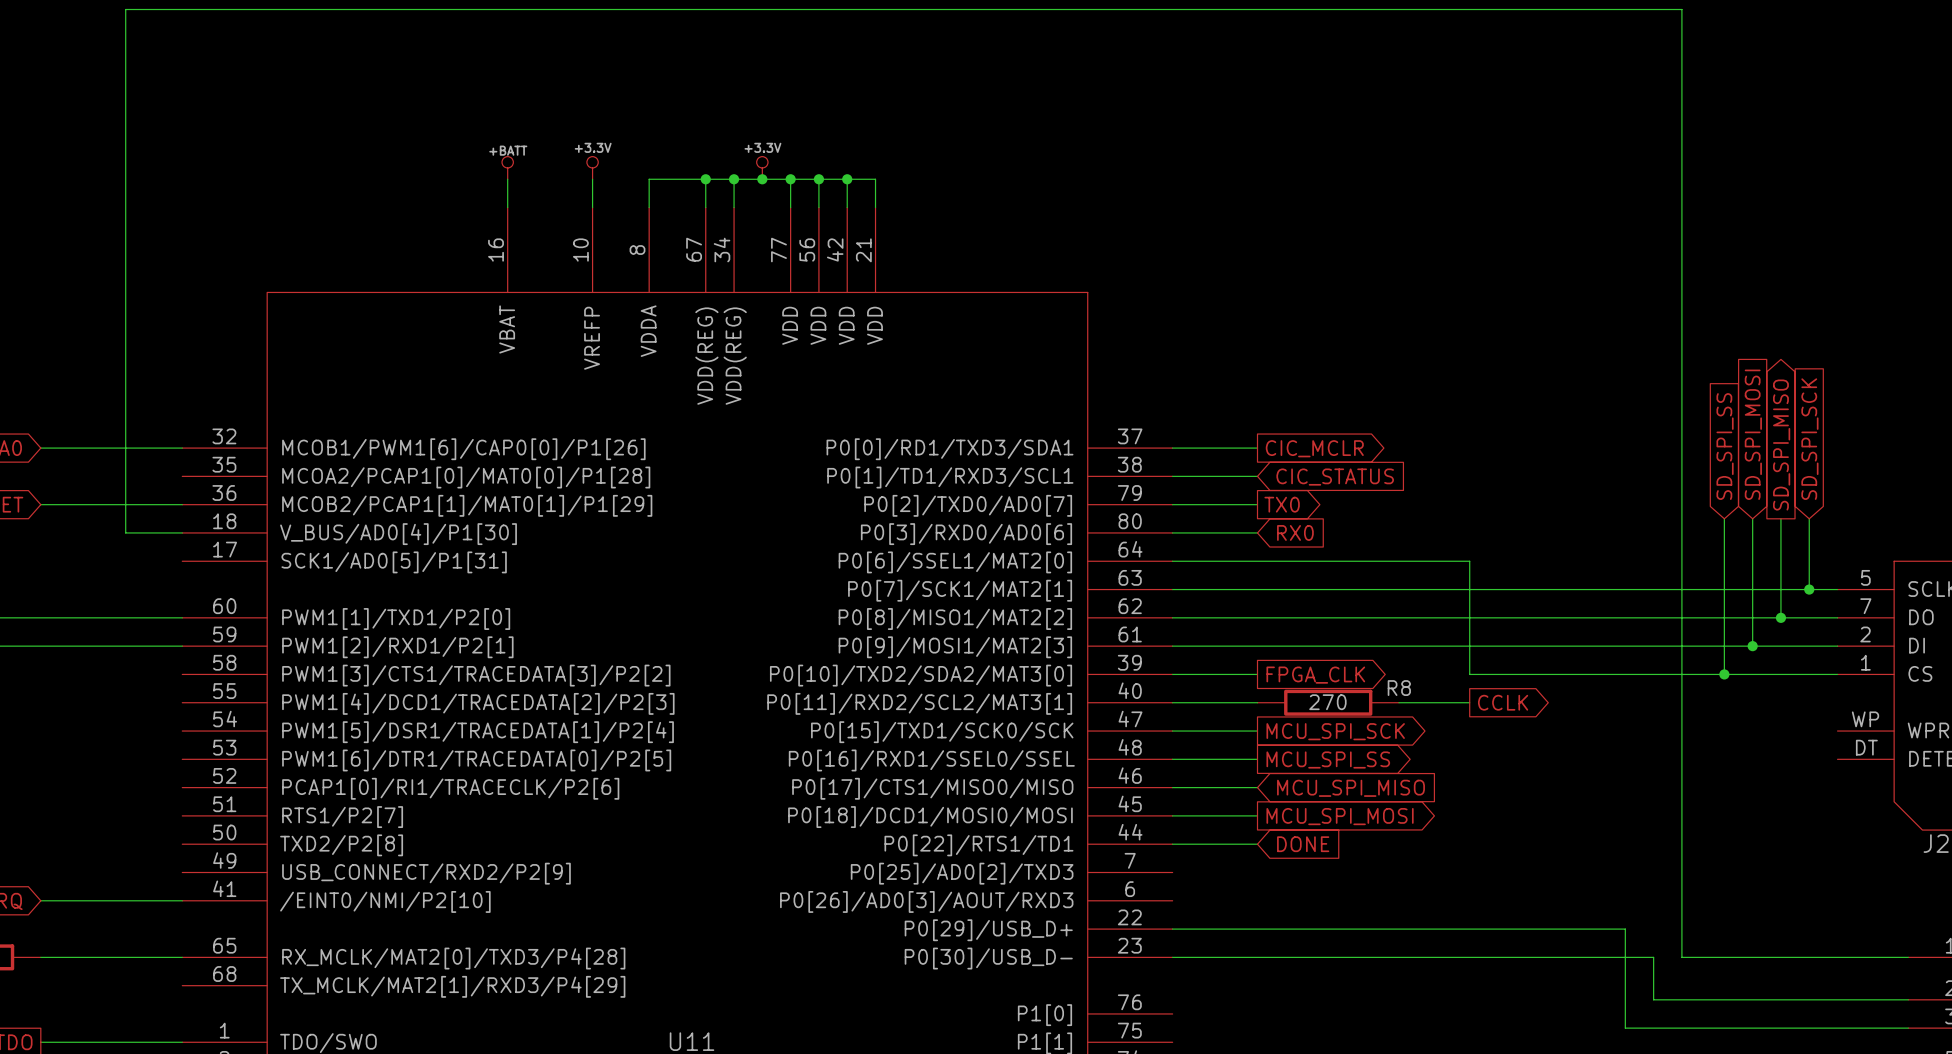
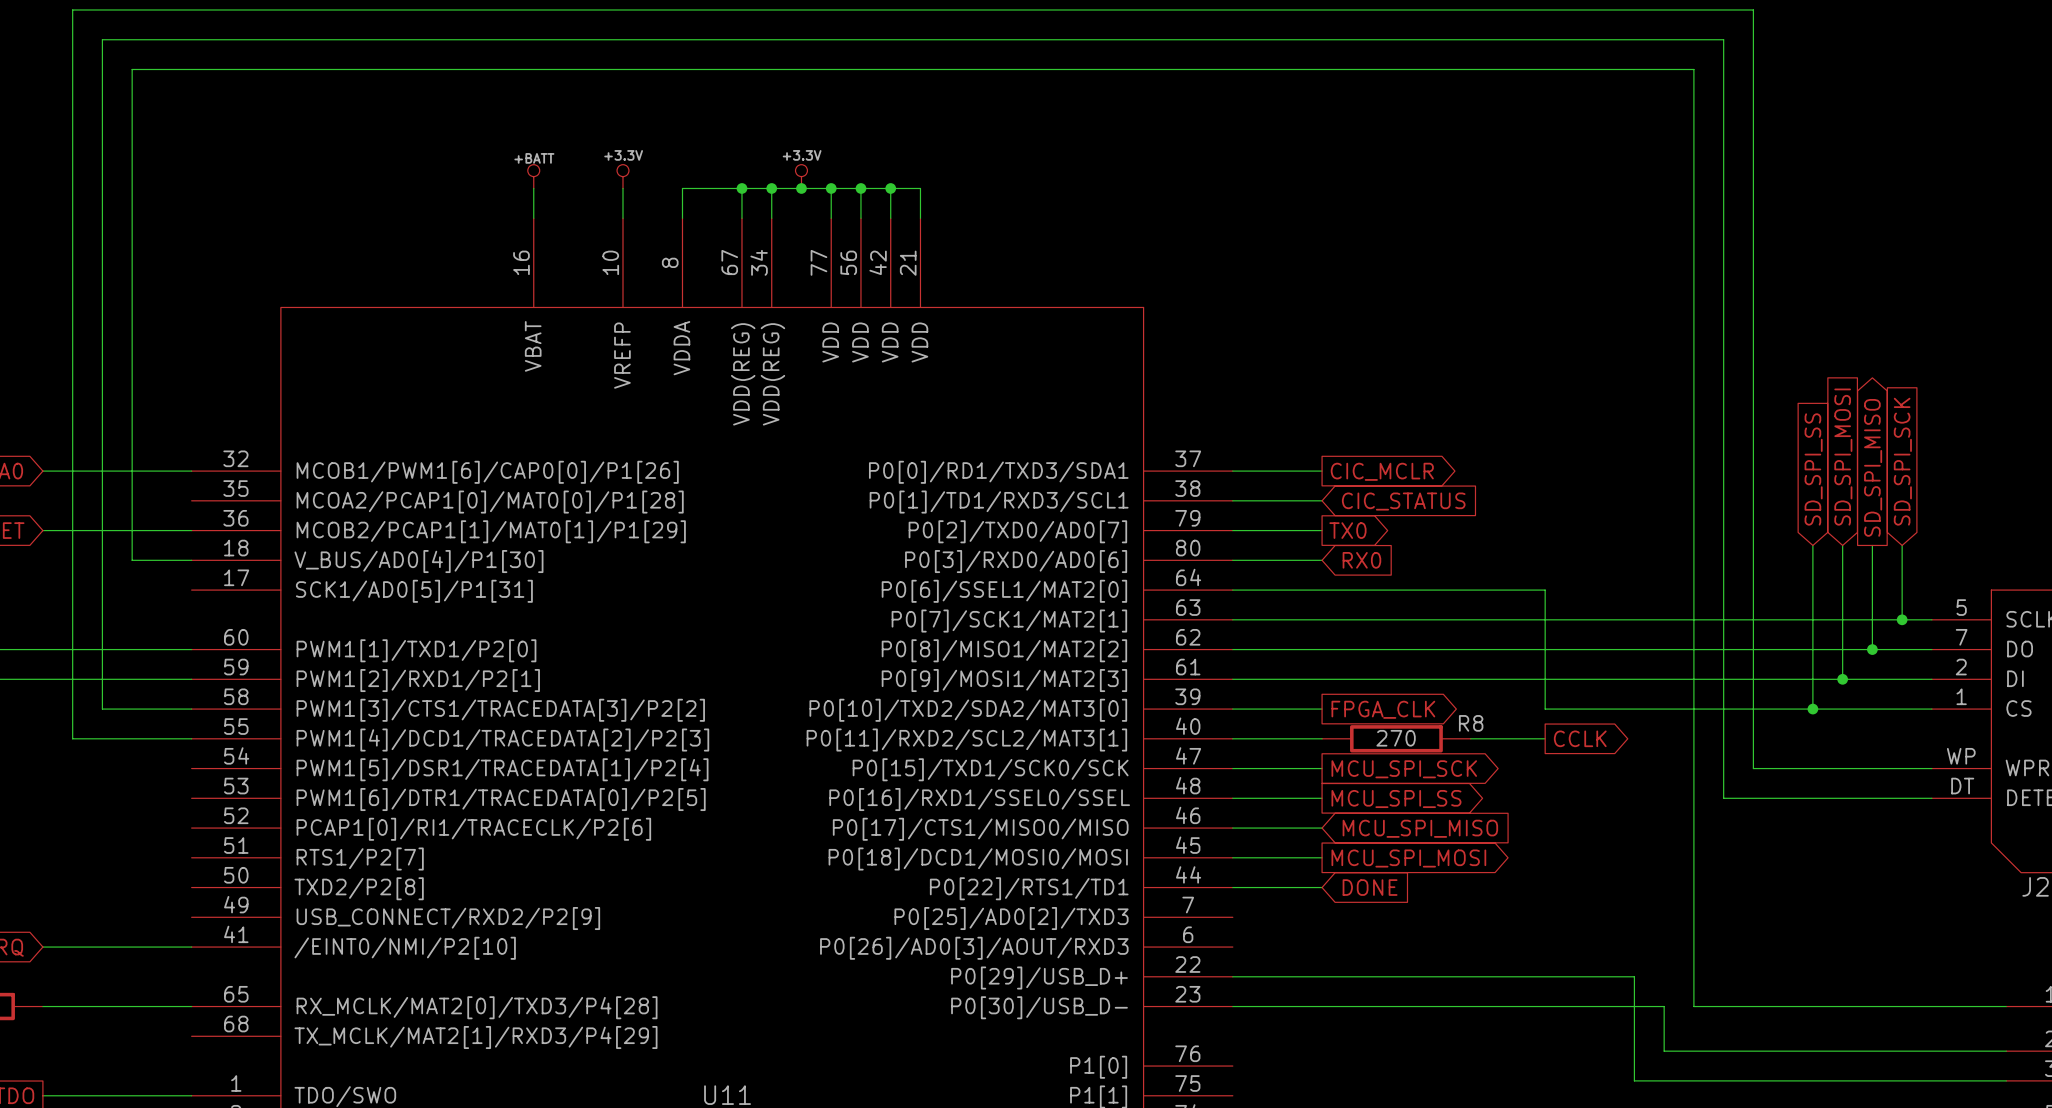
wire: (125, 9) (125, 66) -> (132, 9) (72, 9) (72, 738) (191, 738)
wire: (1667, 9) (1681, 9) (1681, 957) -> (1753, 9) (1753, 768) (1931, 768)
wire: none -> (132, 69) (1693, 69) (1693, 1006)
wire: none -> (191, 709) (102, 709) (102, 39) (1723, 39) (1723, 798) (1931, 798)
wire: (1554, 929) (1625, 929) (1625, 1028) -> (1634, 976) (1634, 1080) (1708, 1080)
wire: (1582, 957) (1611, 957) -> (1664, 1006) (1664, 1051) (1738, 1051)
wire: (1653, 957) (1653, 999) -> (1738, 1006) (1768, 1006)

